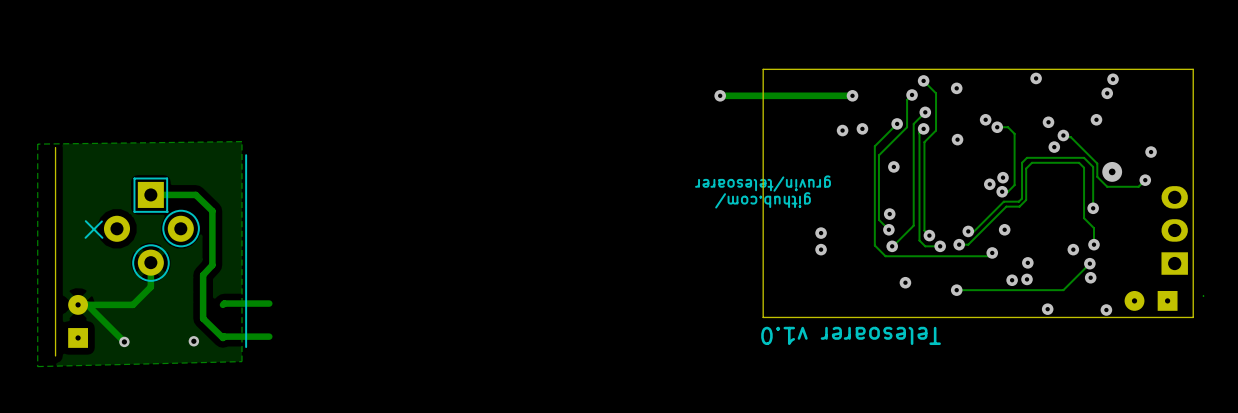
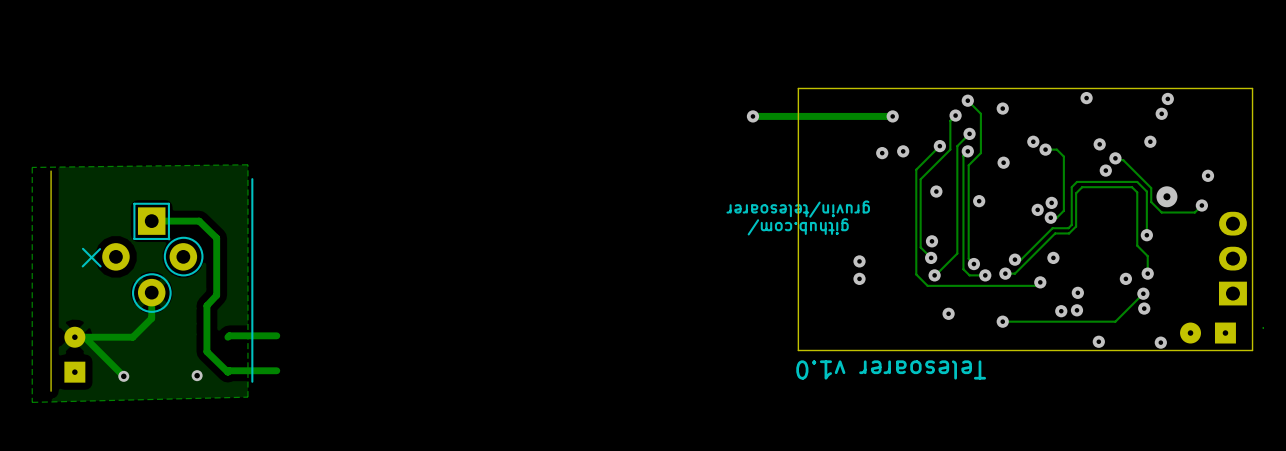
via: none -> (979, 201)

